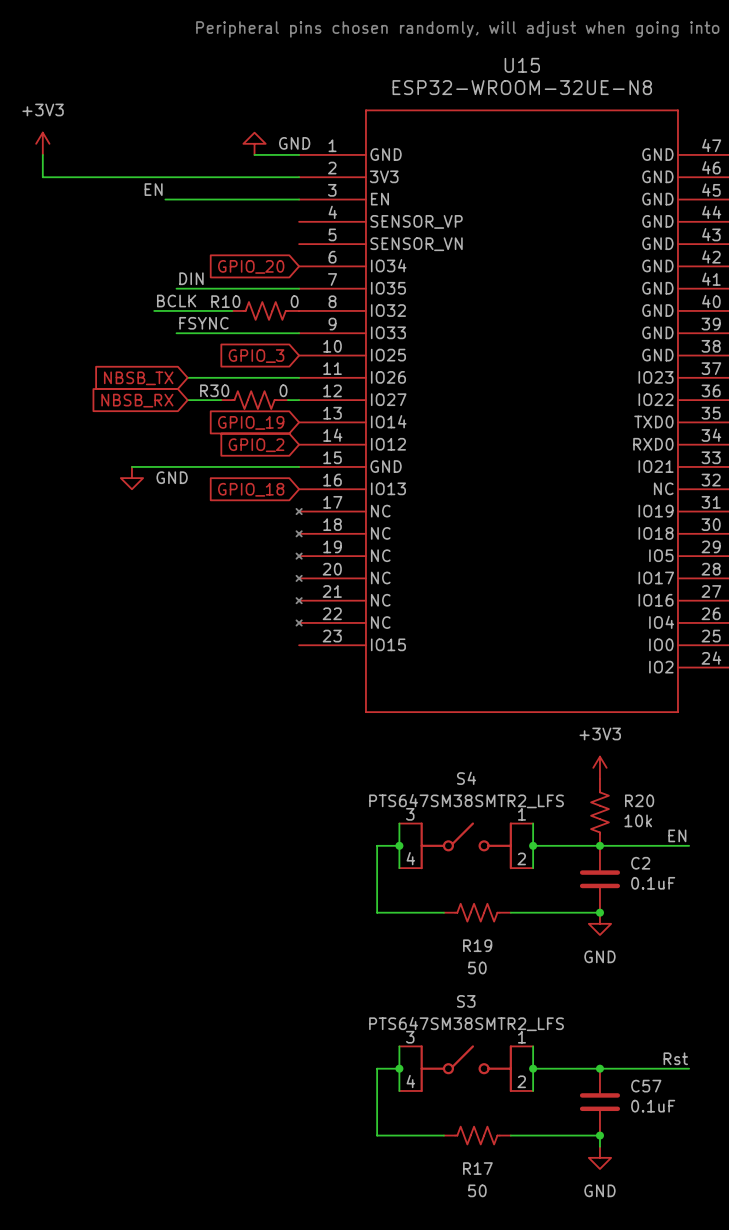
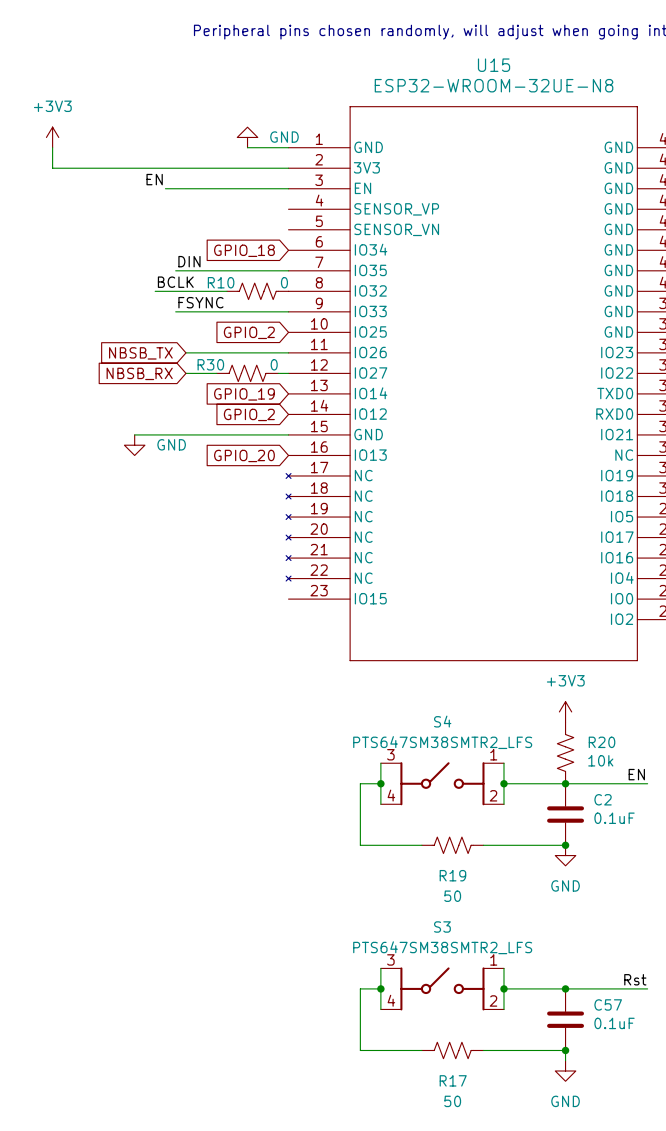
global label: GPIO_20 (251, 266) -> GPIO_18 (244, 250)
global label: GPIO_3 (256, 356) -> GPIO_2 (249, 332)
global label: GPIO_18 (251, 489) -> GPIO_20 (244, 455)

